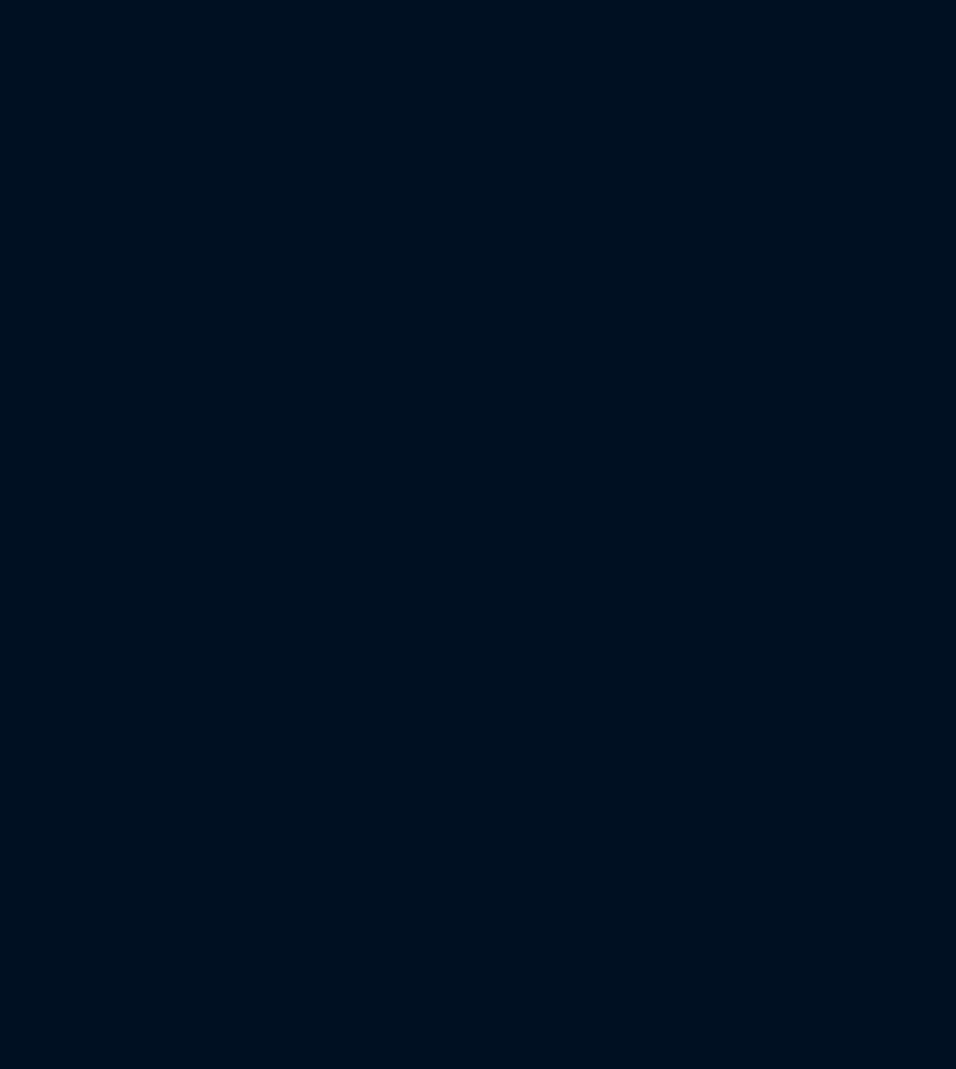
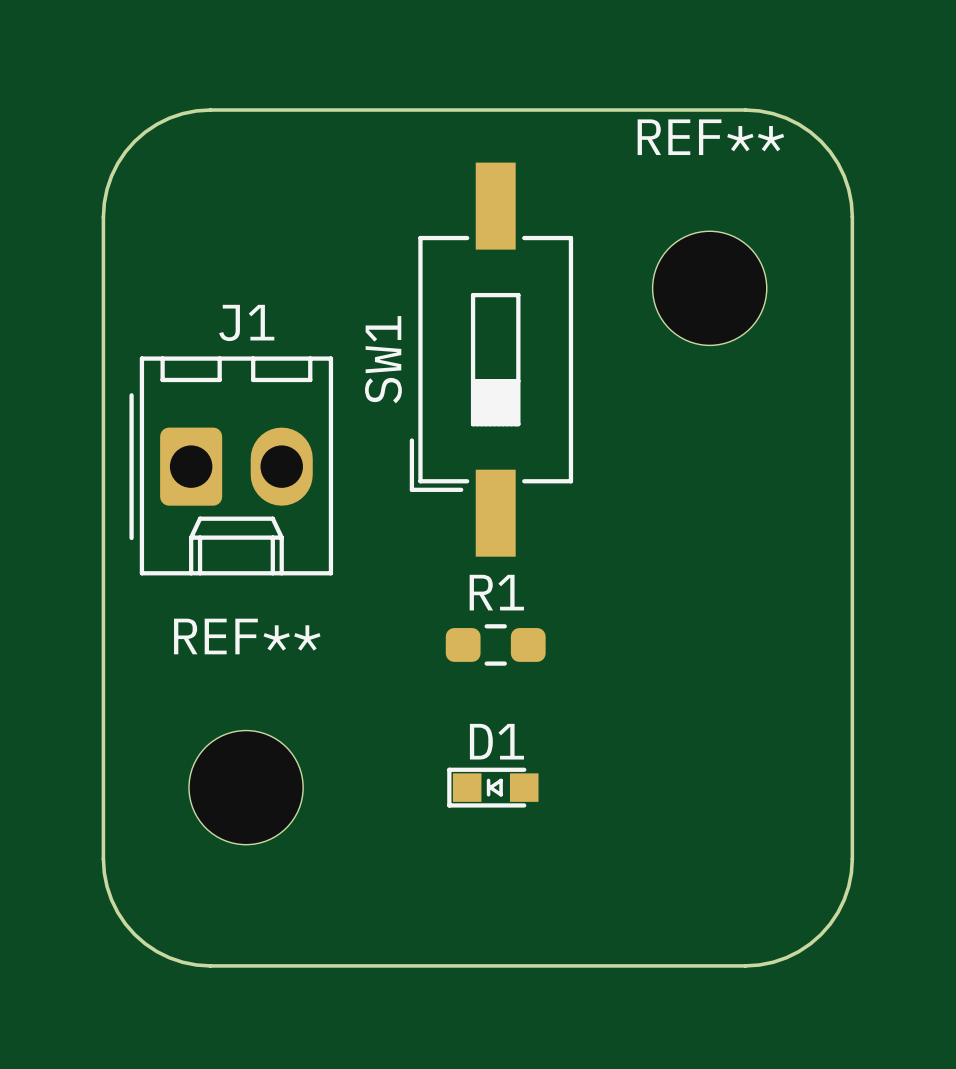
board edge: none -> (210, 110) (759, 110) (773, 113) (798, 124) (810, 132) (830, 151) (844, 176) (848, 189) (852, 217) (852, 858) (848, 886) (838, 912) (830, 924) (810, 943) (786, 957) (773, 962) (745, 965) (210, 965) (196, 965) (169, 957) (145, 943) (125, 924) (117, 912) (107, 886) (103, 858) (104, 203) (111, 176) (125, 151) (134, 141) (156, 124) (169, 118) (182, 113) (210, 110)
REF**: none -> (709, 288)
SW1: none -> (491, 359)
J1: none -> (231, 465)
R1: none -> (495, 644)
REF**: none -> (246, 787)
D1: none -> (492, 787)

